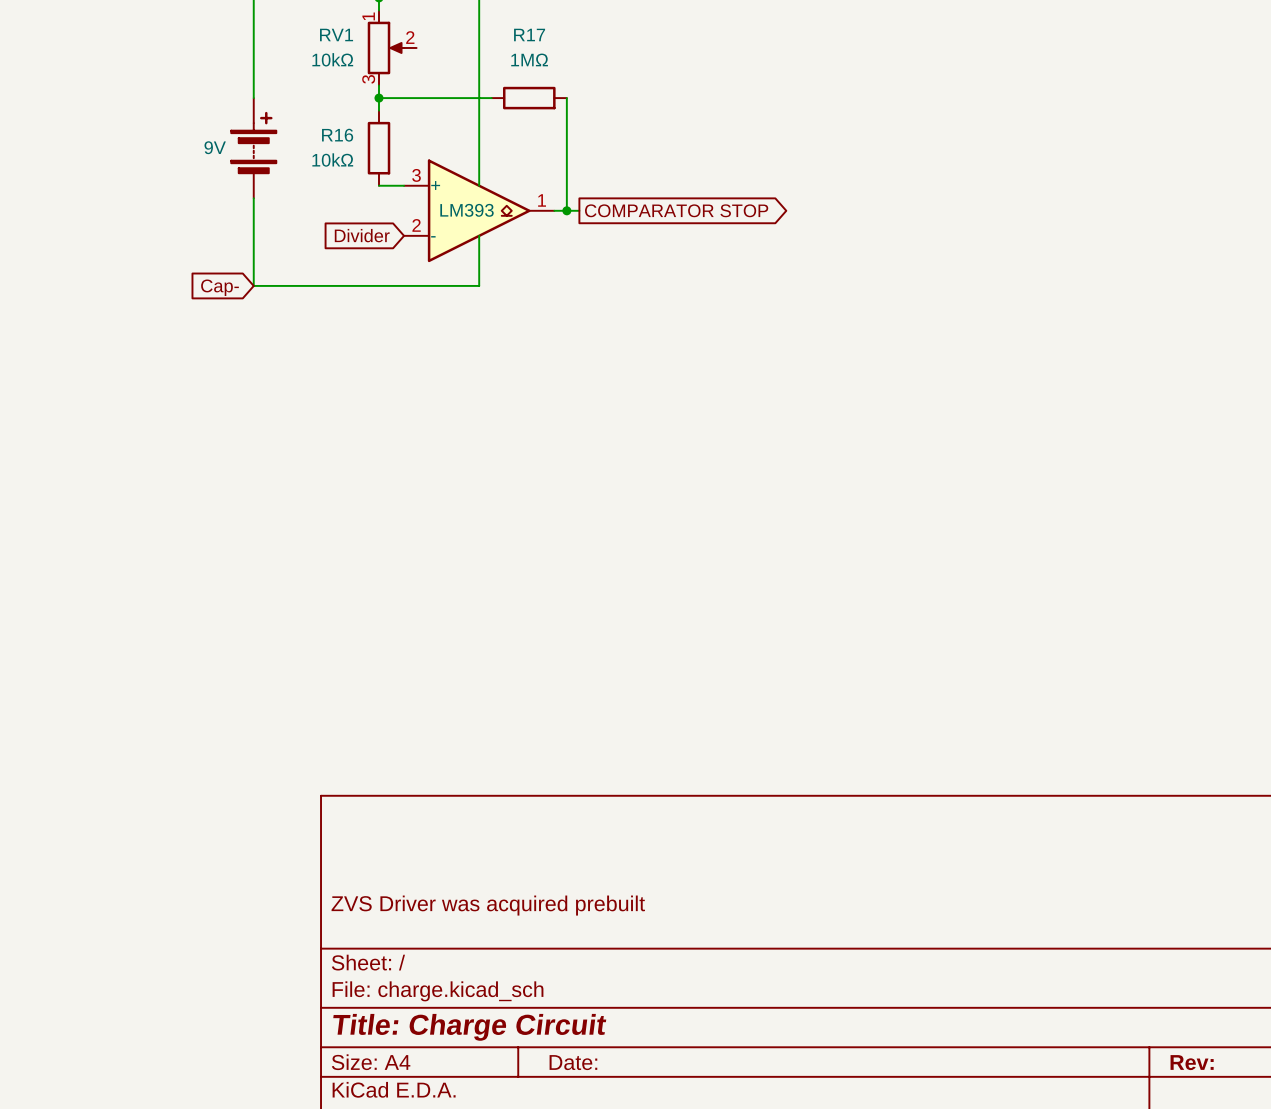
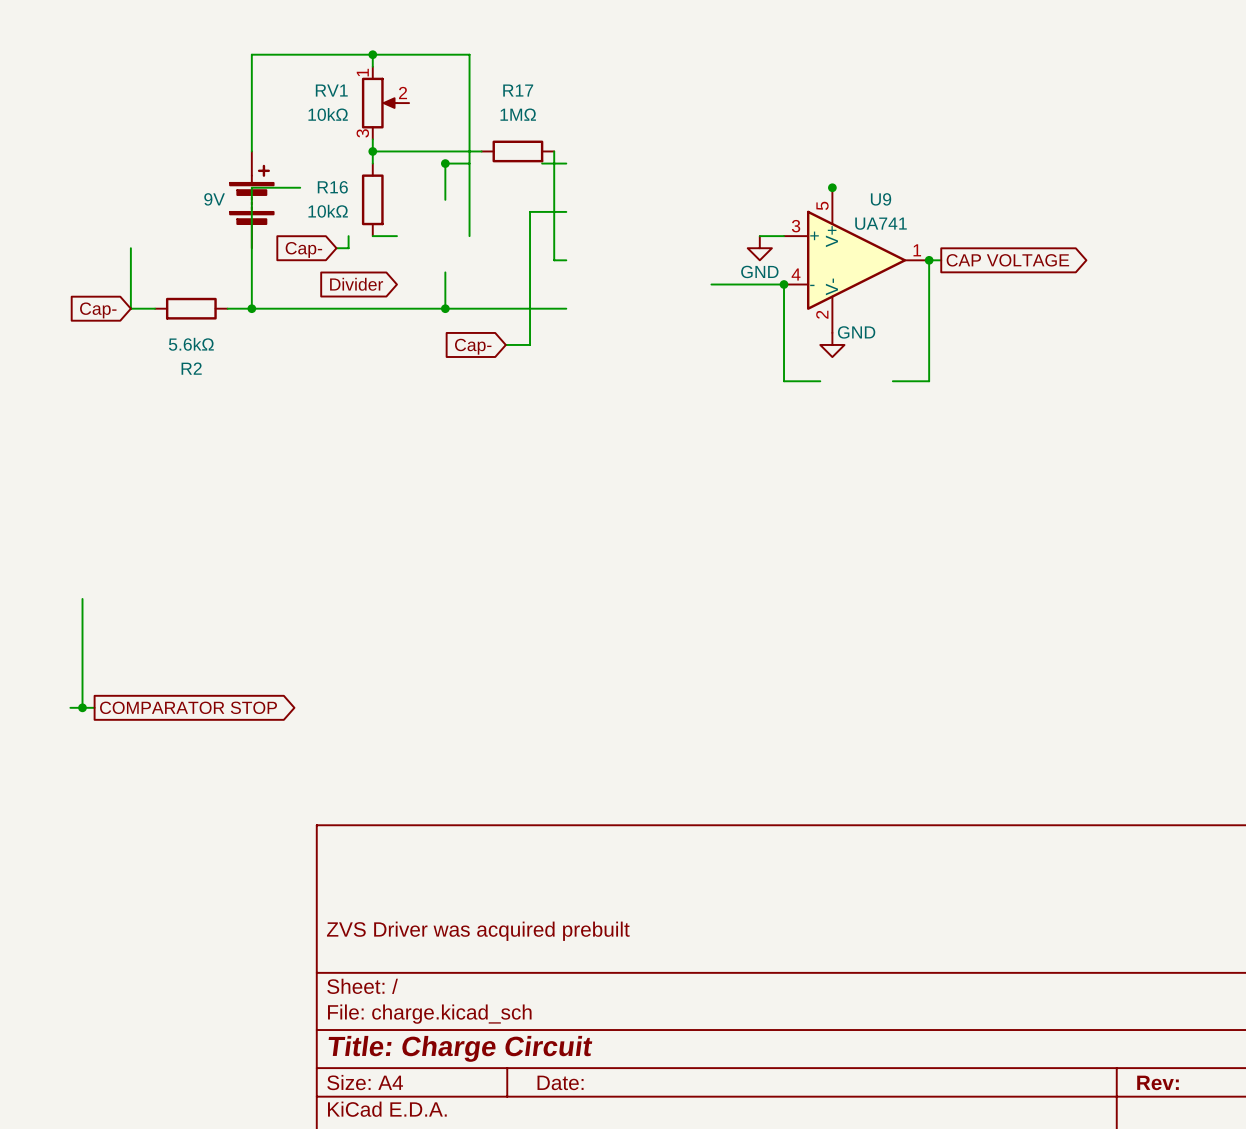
junction: none -> (445, 163)
wire: none -> (469, 163) (445, 163) (445, 199)
wire: none -> (542, 163) (566, 163)
wire: none -> (300, 187) (251, 187) (251, 248)
junction: none -> (832, 187)
wire: none -> (566, 211) (530, 211) (530, 344) (505, 344)
wire: none -> (348, 236) (348, 248) (336, 248)
wire: none -> (759, 236) (784, 236)
wire: none -> (130, 248) (130, 308) (155, 308)
power symbol: none -> GND (759, 248)
global label: none -> Cap- (303, 249)
part: LM393 (479, 210) -> none
wire: (554, 210) (566, 210) -> none
junction: (566, 210) -> none
global label: COMPARATOR STOP (676, 210) -> none
U9: none -> UA741 (856, 260)
junction: none -> (929, 260)
wire: none -> (941, 260) (929, 260) (929, 381) (892, 381)
global label: none -> CAP VOLTAGE (1007, 260)
wire: (479, 235) (479, 285) (253, 285) (253, 260) -> none
wire: none -> (711, 284) (784, 284) (784, 381) (820, 381)
junction: none -> (784, 284)
R2: none -> 5.6kΩ (191, 308)
wire: none -> (227, 308) (566, 308)
junction: none -> (251, 308)
junction: none -> (445, 308)
global label: none -> Cap- (98, 310)
global label: Cap- (219, 287) -> none
power symbol: none -> GND (832, 344)
global label: none -> Cap- (473, 346)
wire: none -> (82, 598) (82, 707)
wire: none -> (70, 707) (94, 707)
junction: none -> (82, 707)
global label: none -> COMPARATOR STOP (188, 707)

